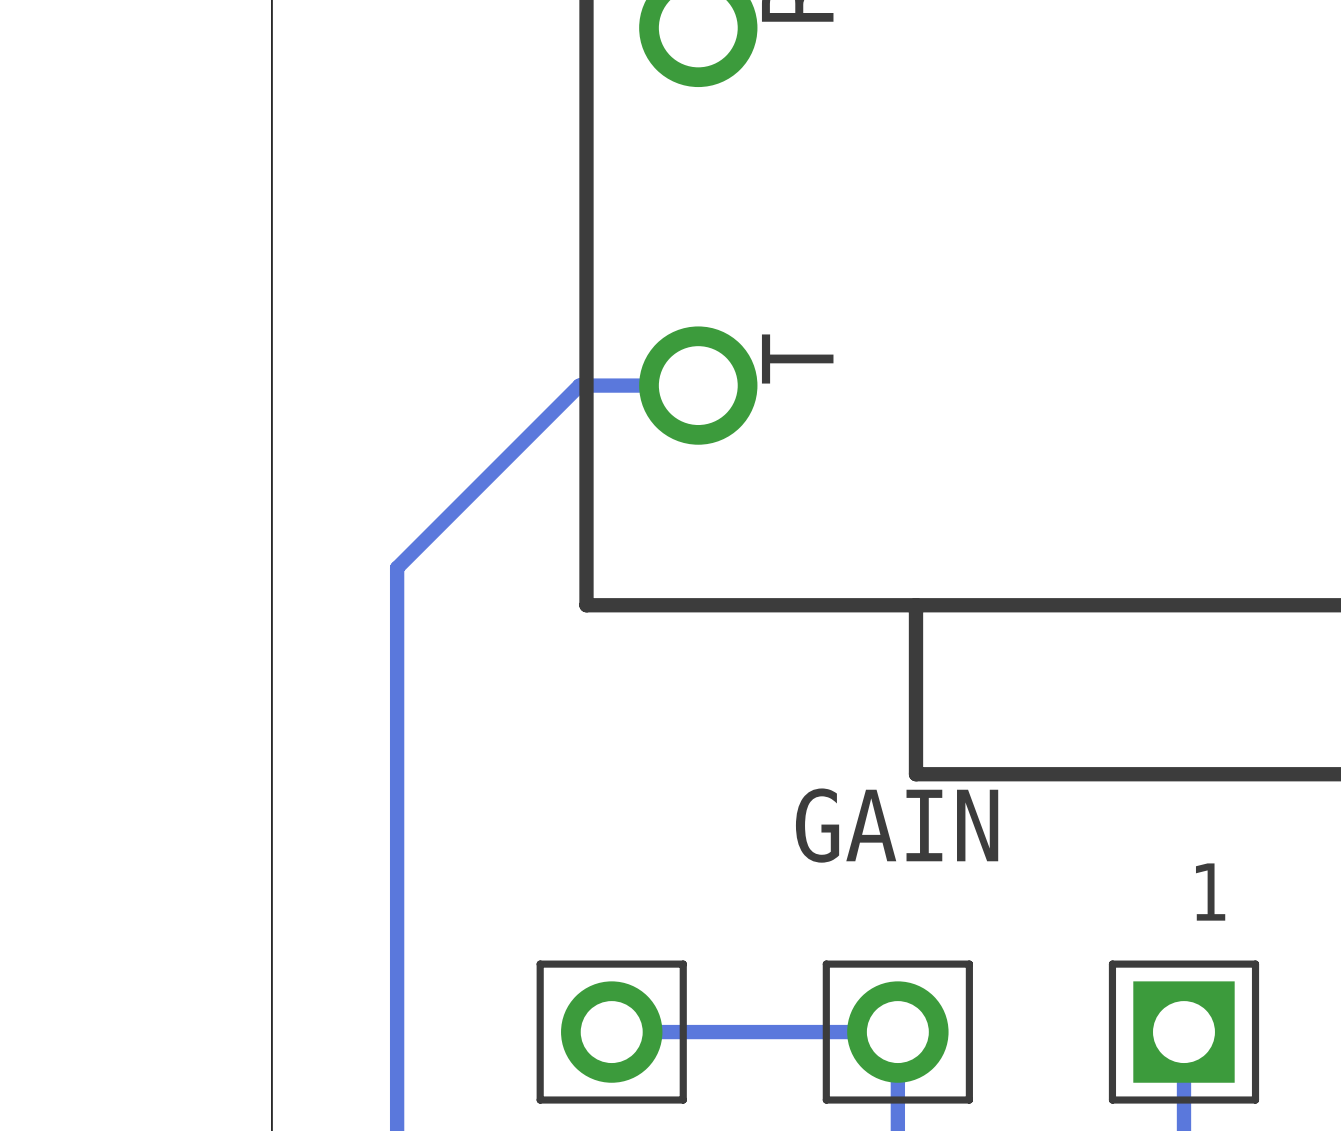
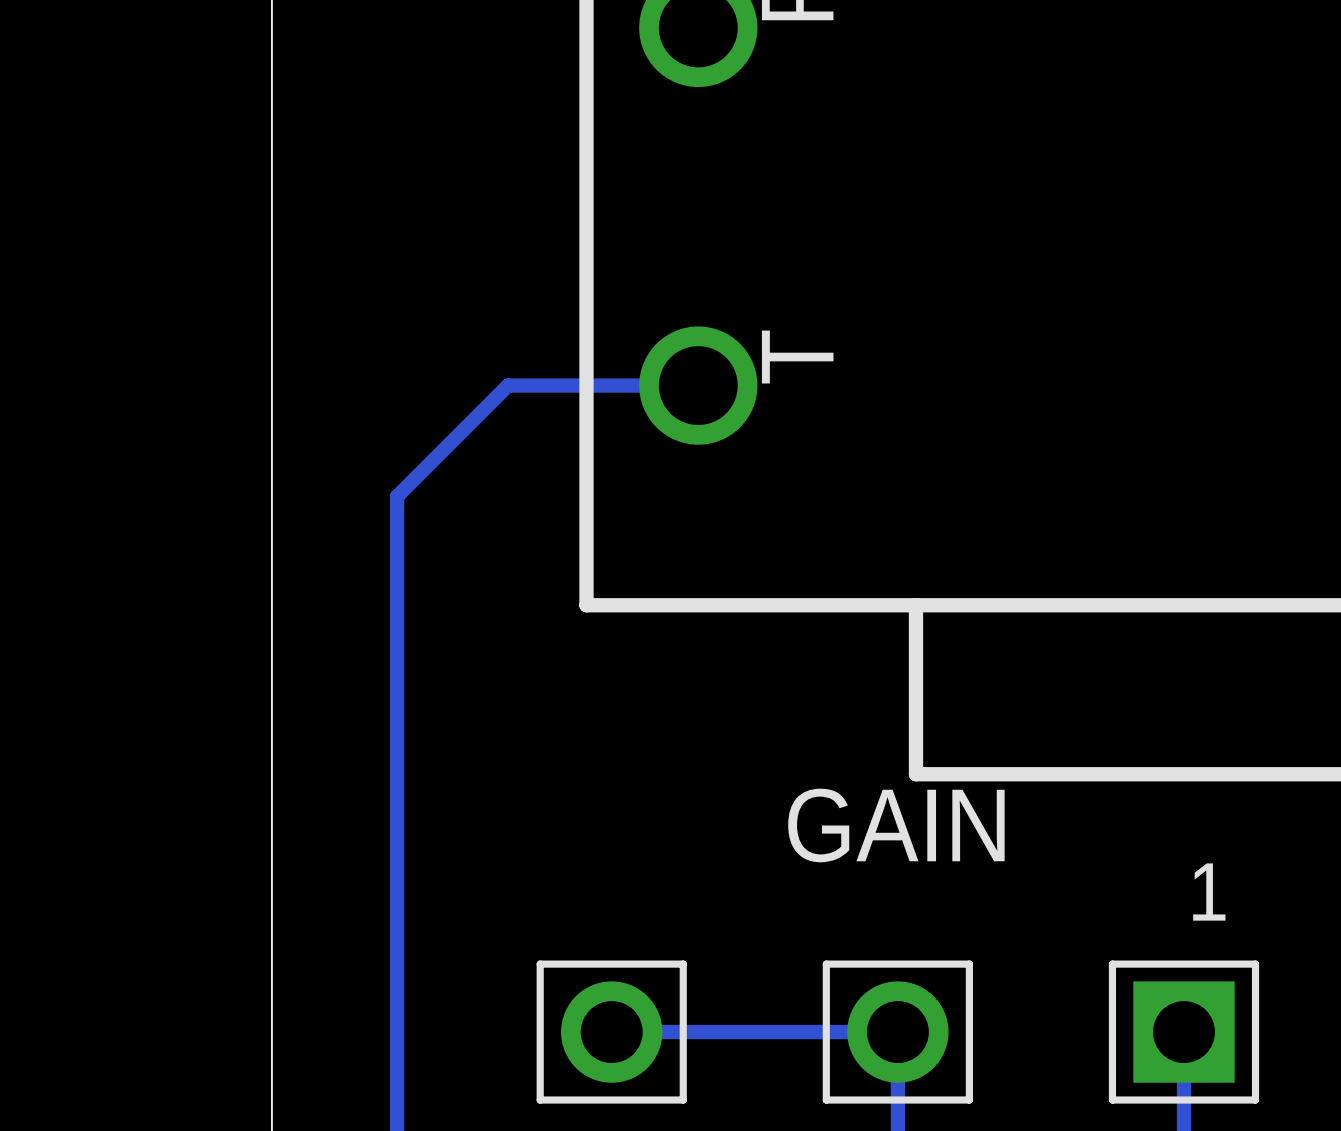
bottom track: (579, 385) (397, 567) -> (579, 385) (508, 385) (397, 496) (397, 567)

